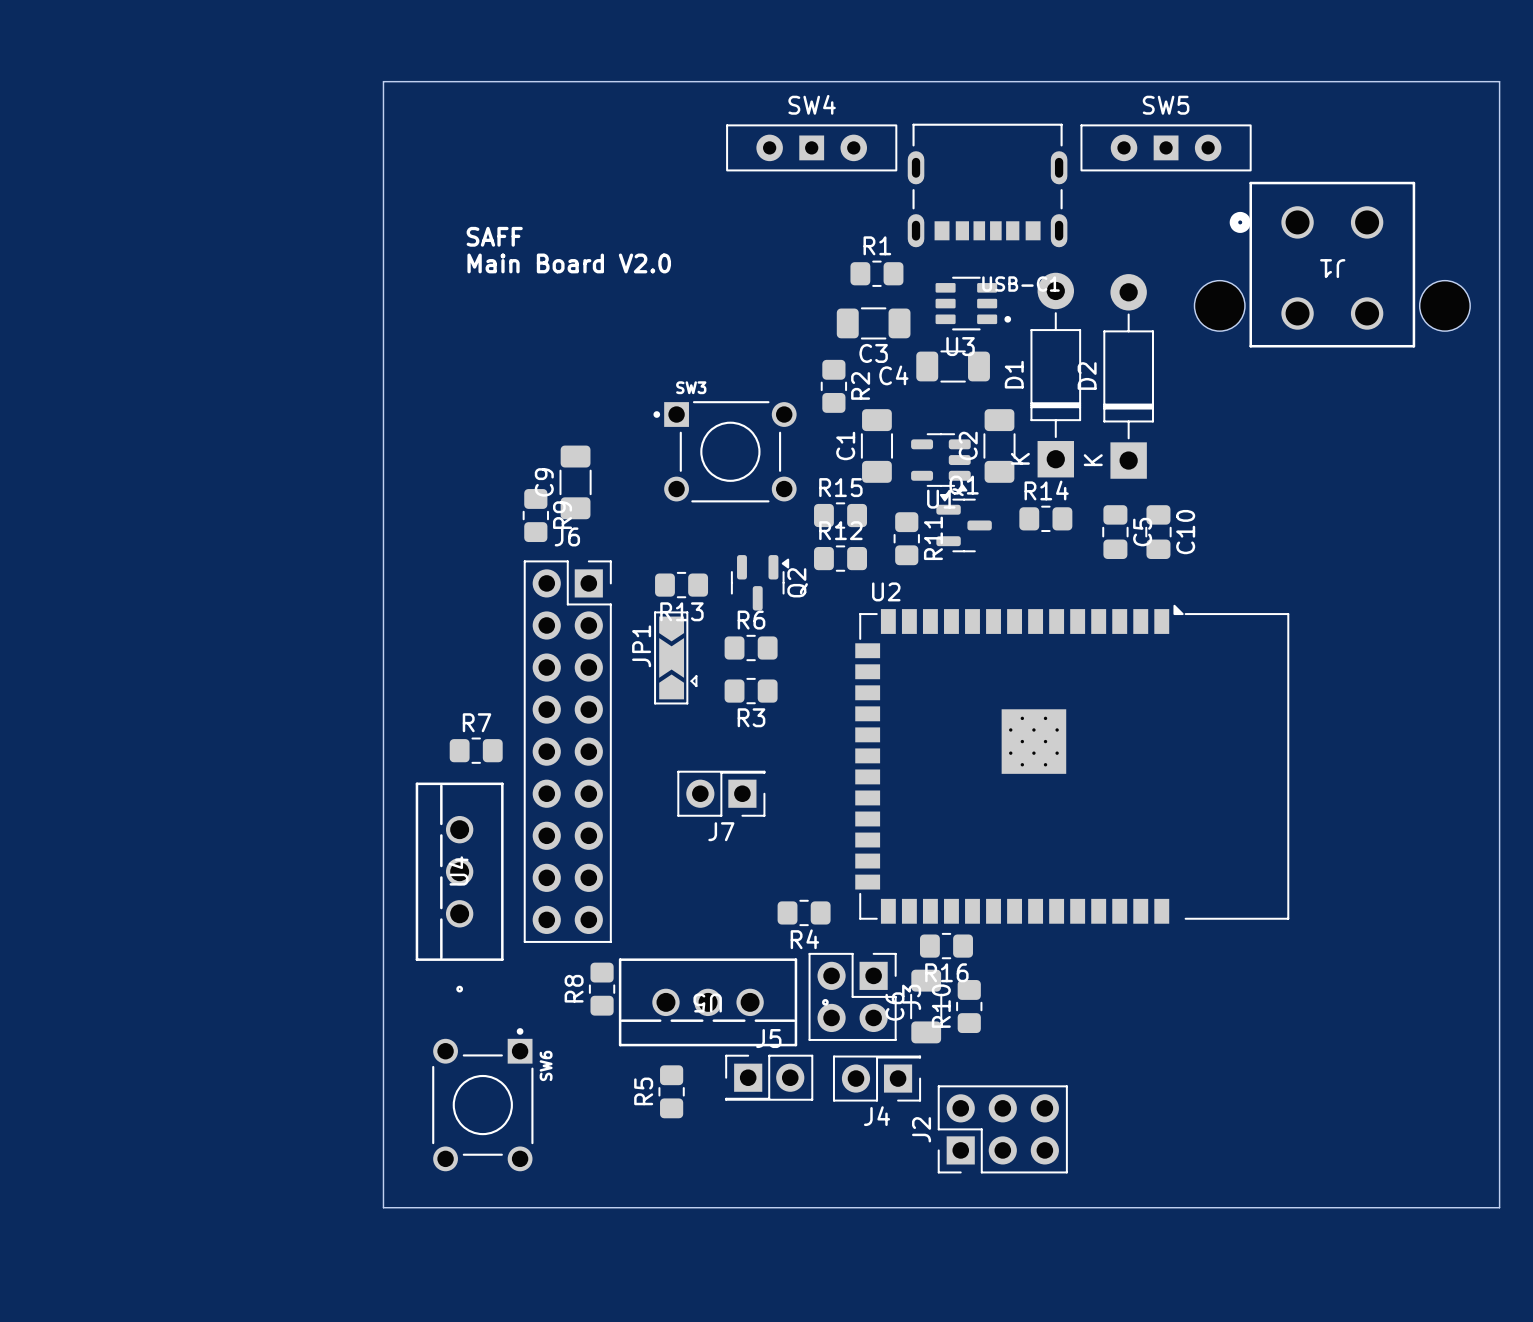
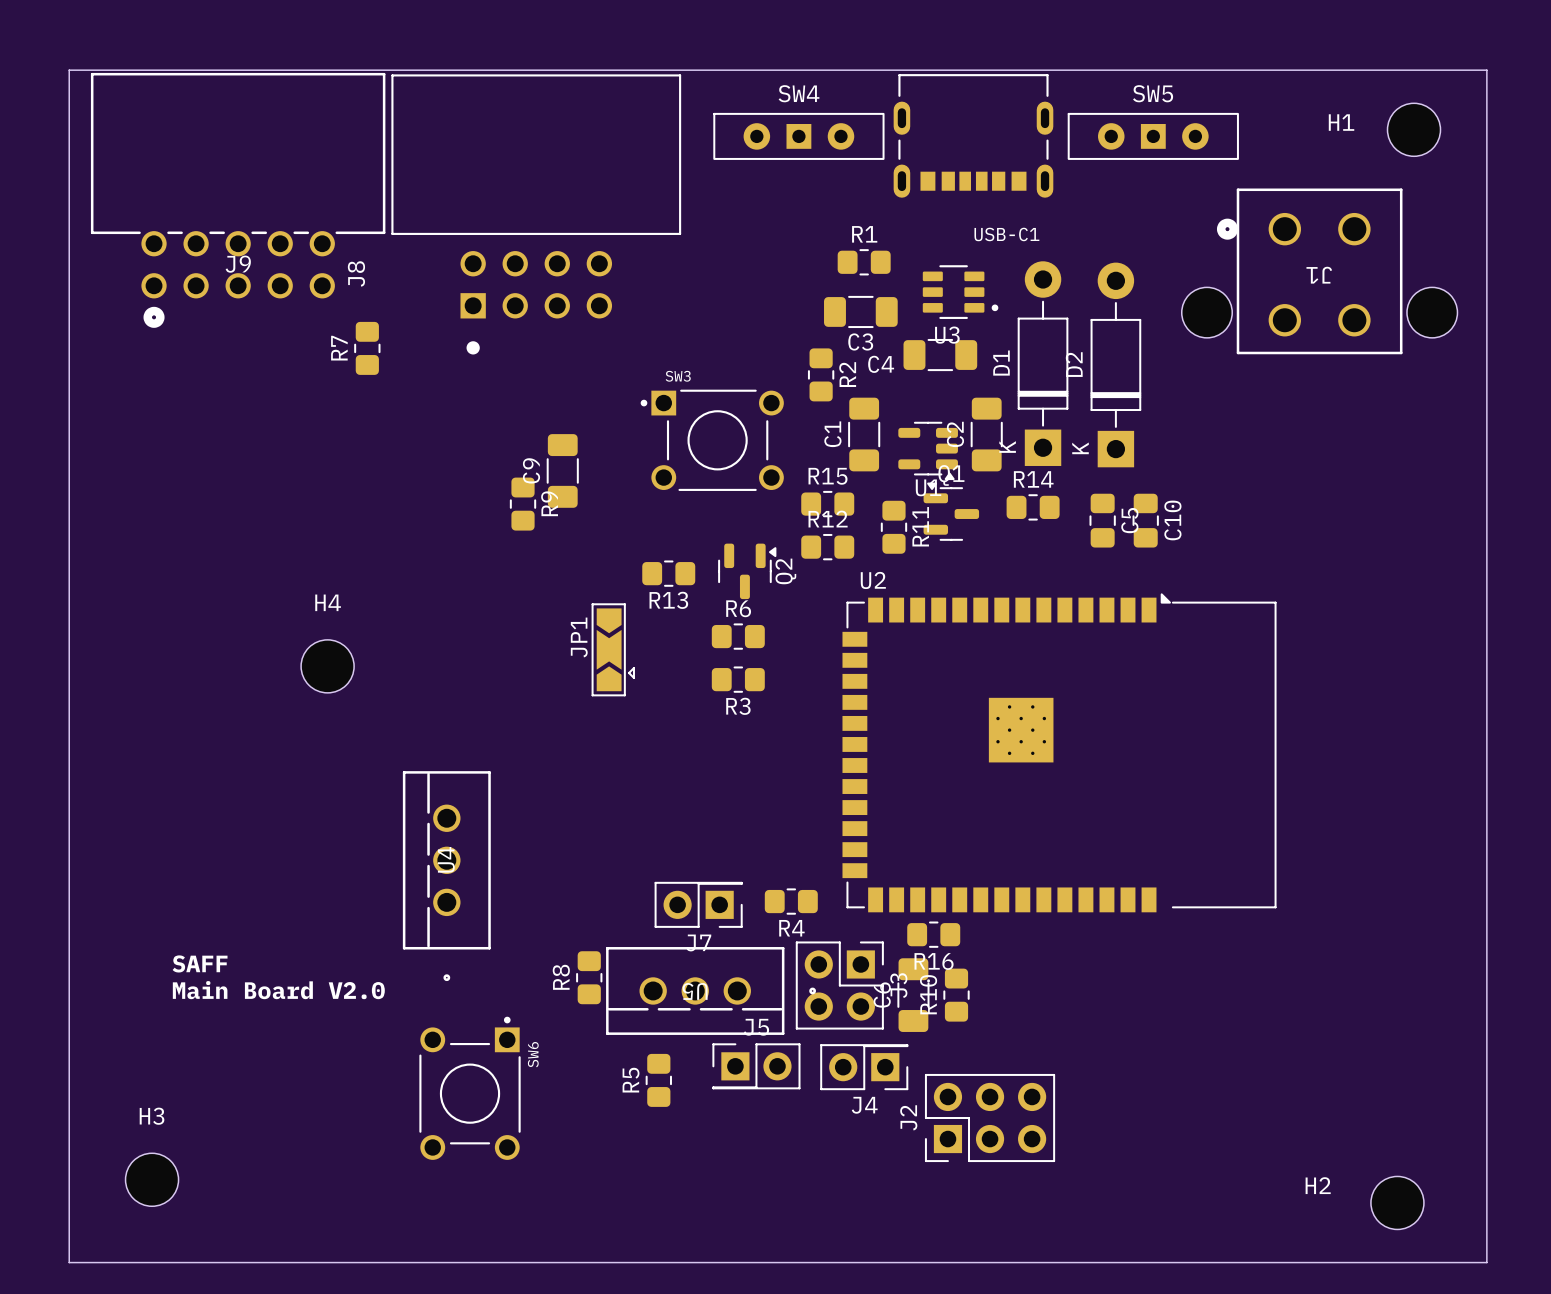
board edge: (383, 81) (383, 1207) (1499, 1207) -> (370, 70) (69, 70) (69, 1262) (1486, 1262) (1486, 1196)
H1: none -> (1414, 129)
USB-C1 position: (987, 185) -> (973, 135)
J9: none -> (238, 200)
J8: none -> (536, 214)
text: SAFF (494, 236) -> none
text: Main Board V2.0 (569, 263) -> none
J1 position: (1332, 264) -> (1319, 271)
JP1 position: (675, 657) -> (613, 649)
H4: none -> (327, 666)
R7 name position: R7 (476, 722) -> R7 (339, 348)
R7 rotation: 0° (476, 750) -> 90° clockwise (367, 348)
R7 position: (476, 750) -> (367, 348)
J6: (567, 751) -> none
J7 position: (721, 793) -> (698, 904)
text: none -> SAFF (200, 963)
text: none -> Main Board V2.0 (278, 990)
H3: none -> (152, 1179)
H2: none -> (1397, 1202)

